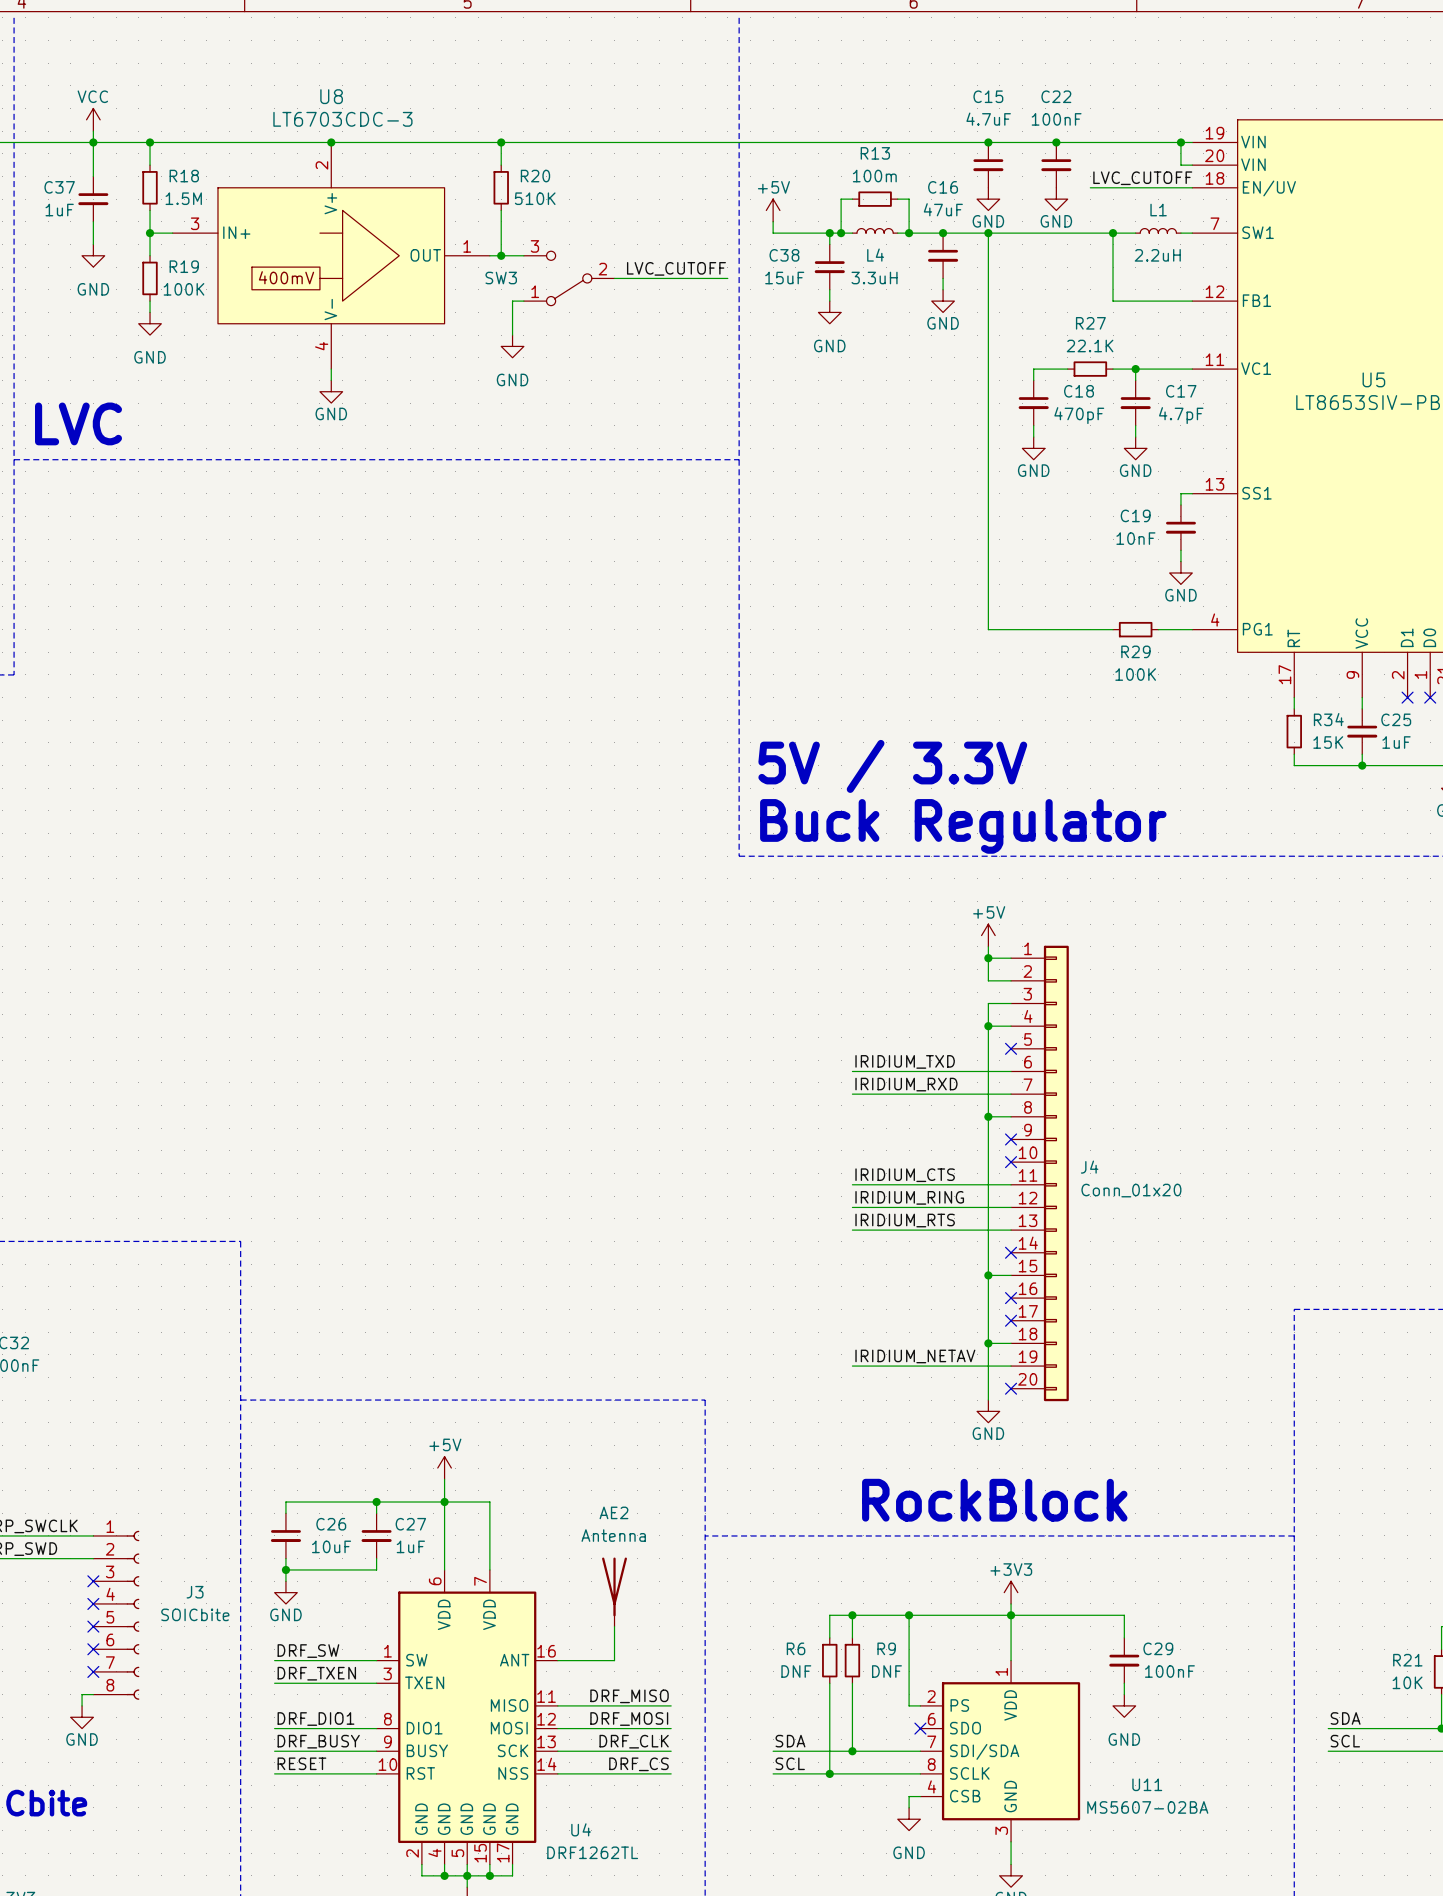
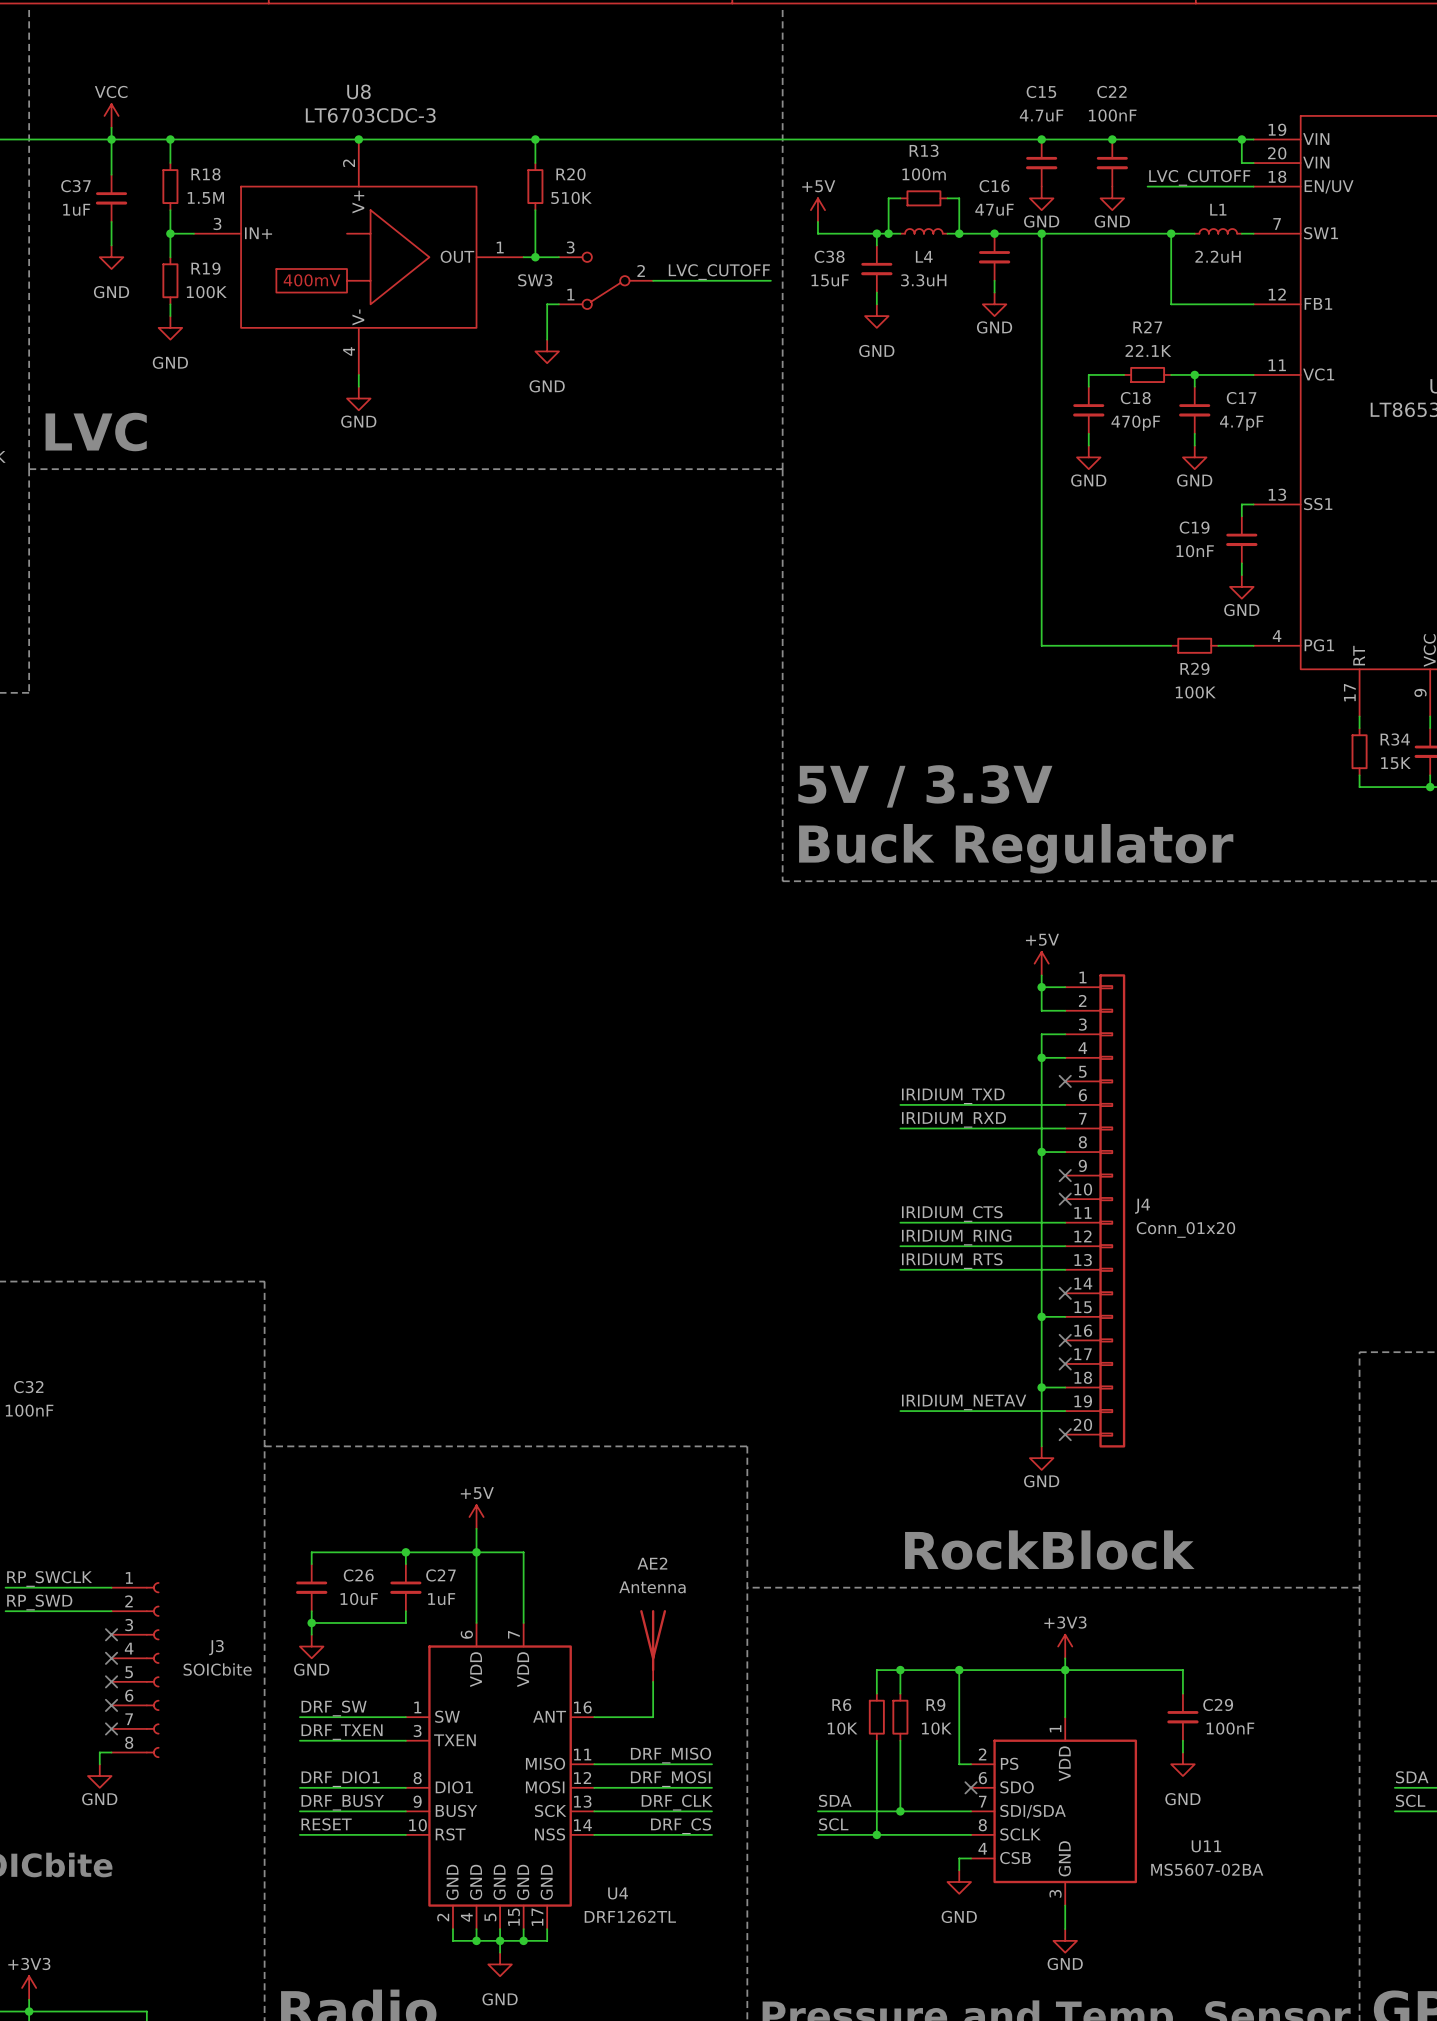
R6 value: DNF (796, 1671) -> 10K (842, 1728)
R9 value: DNF (886, 1671) -> 10K (936, 1728)

